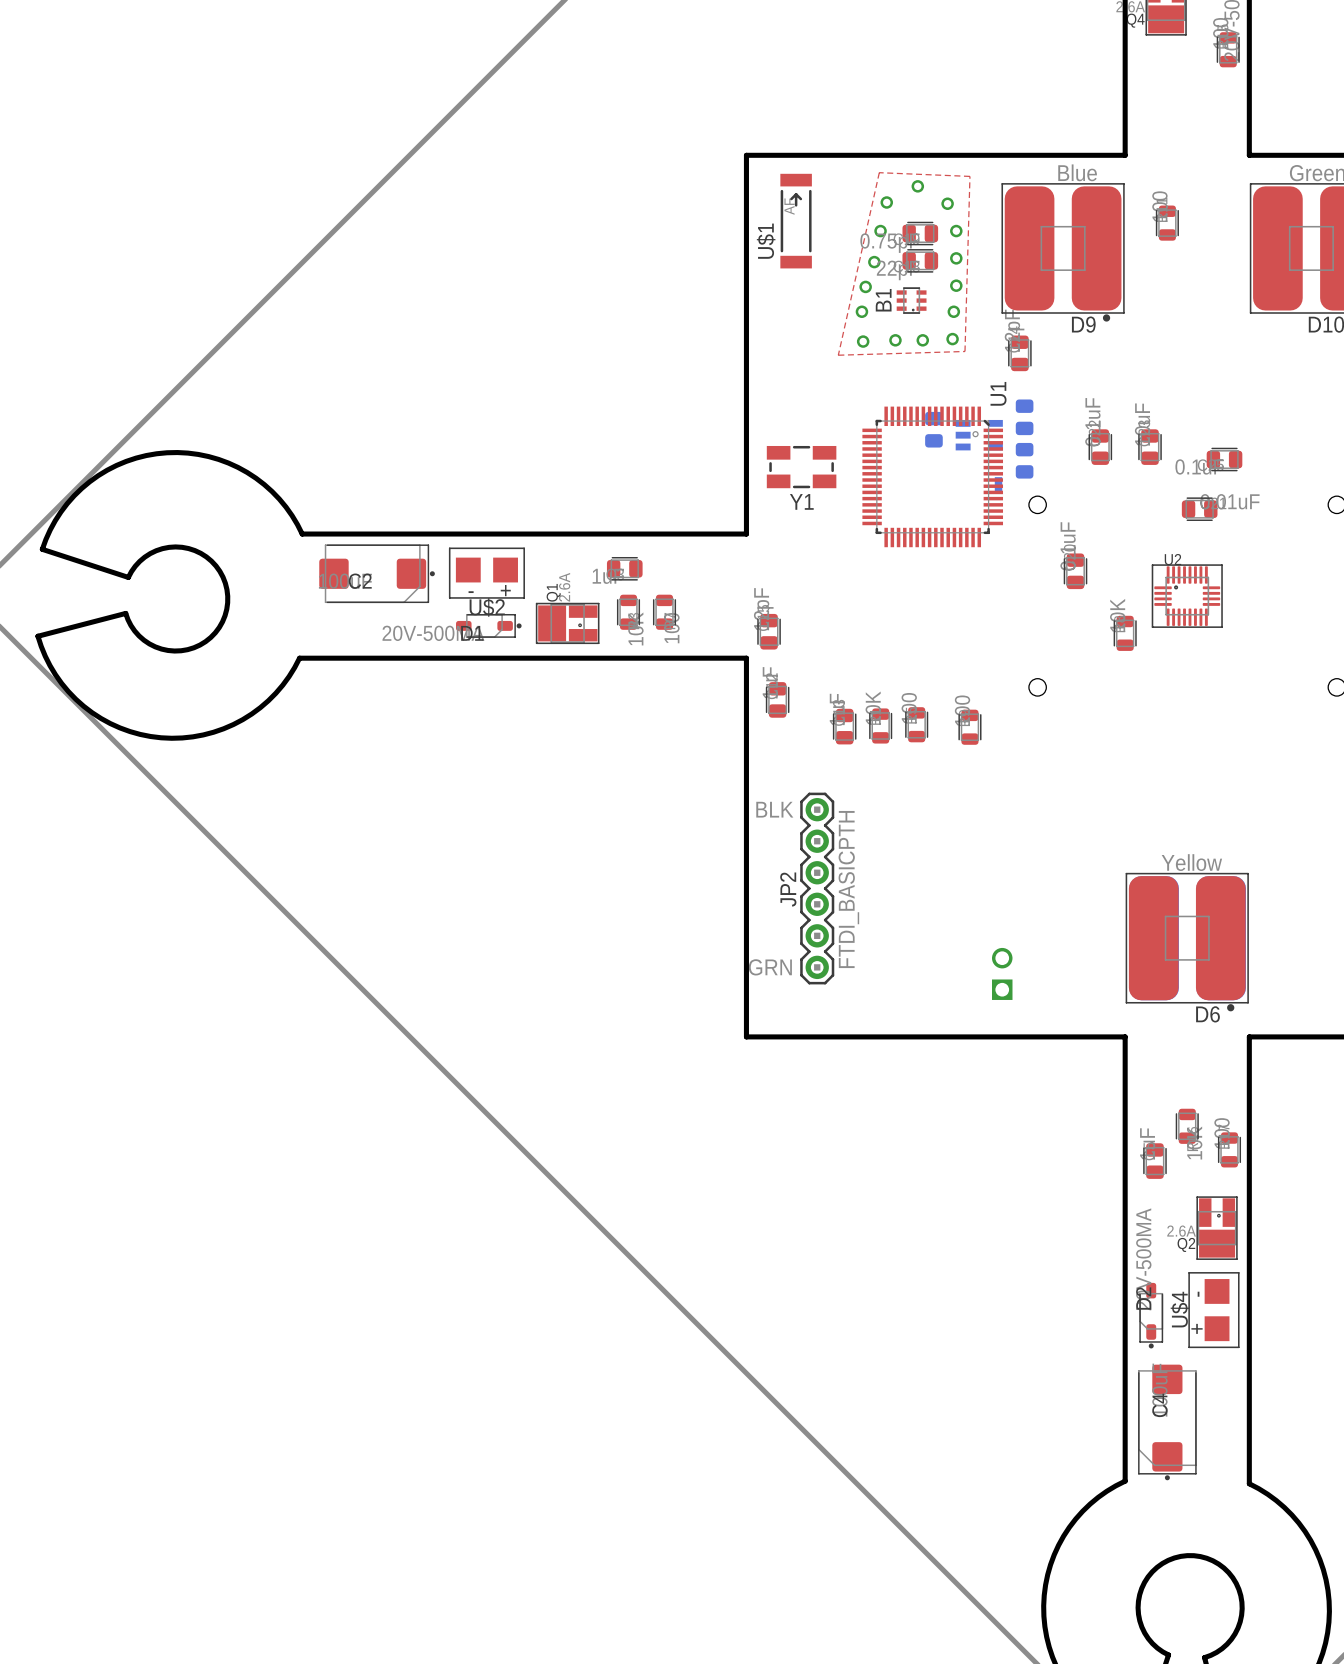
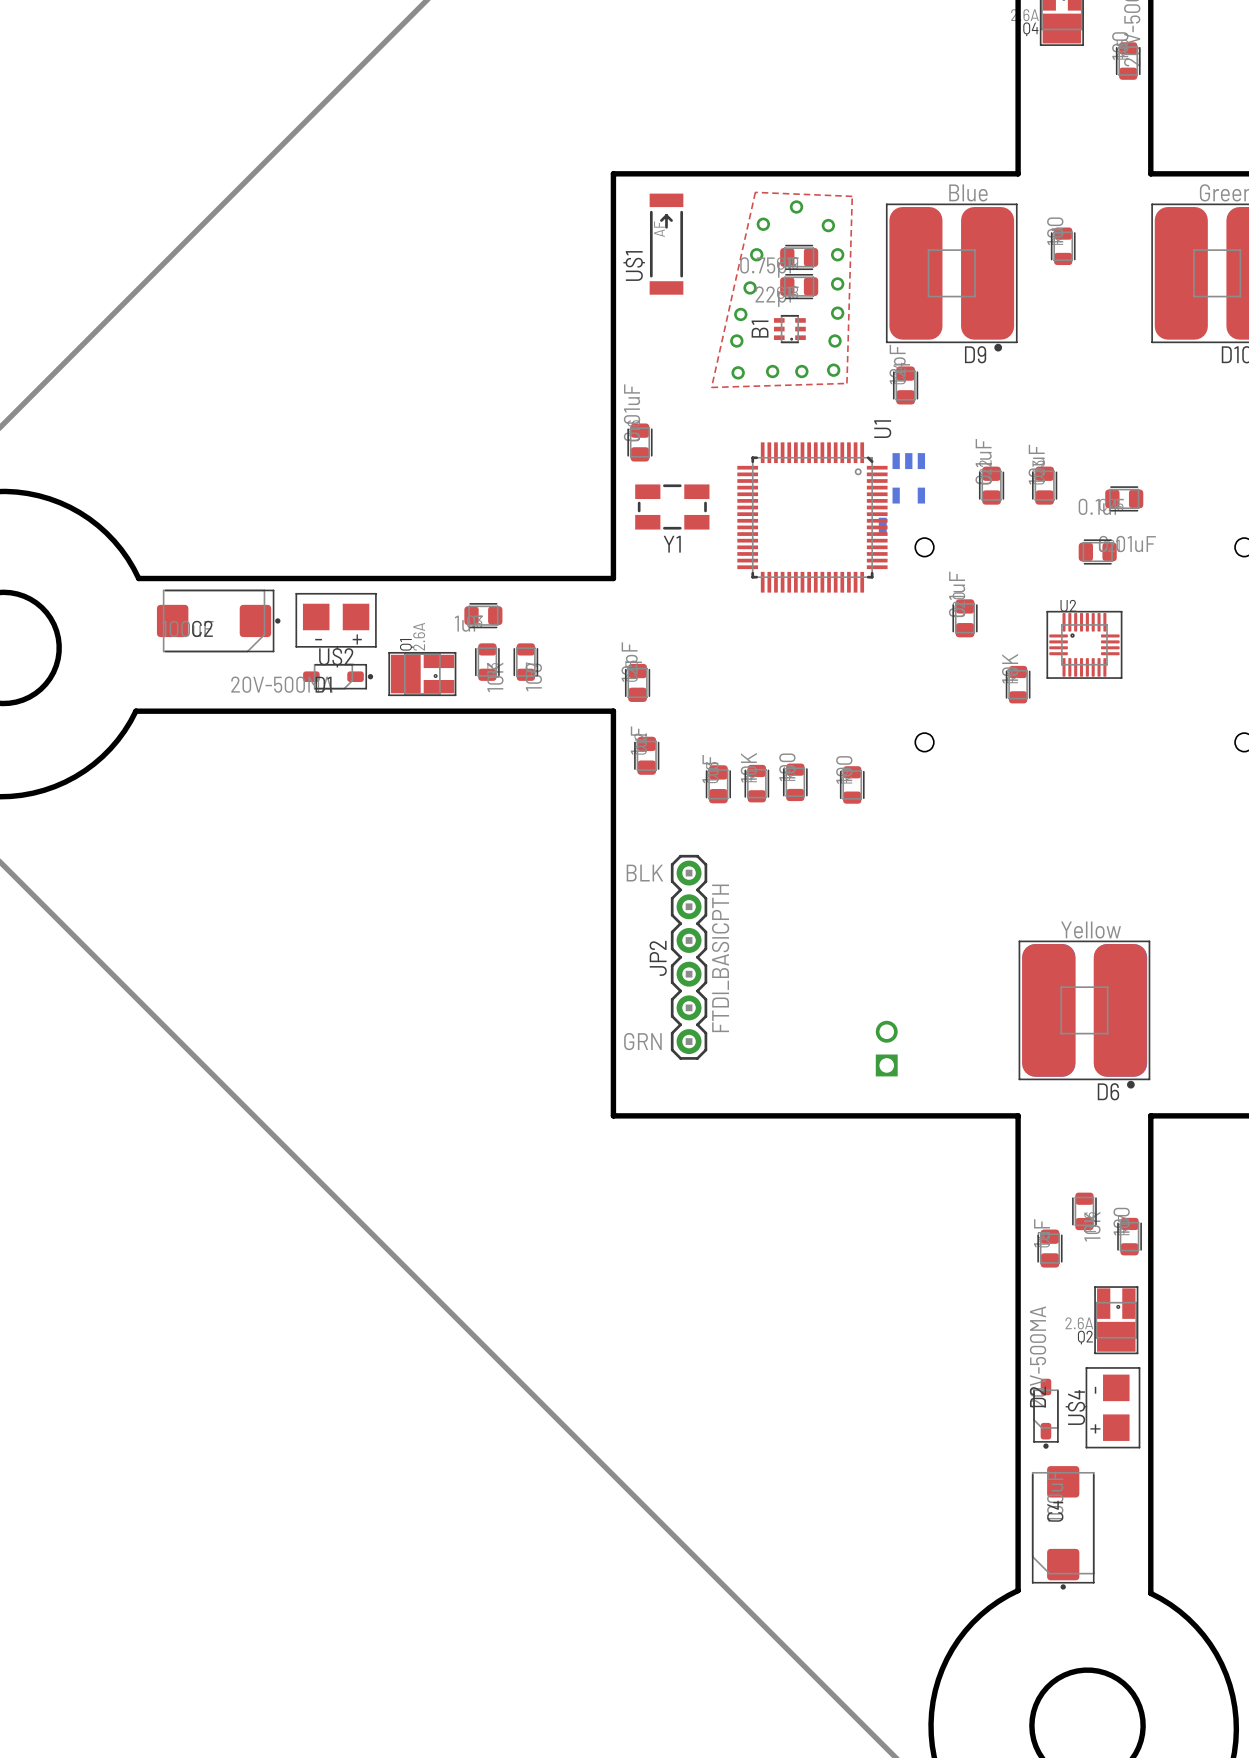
part: (1024, 417) -> none
part: (933, 429) -> none
part rotation: 0° (979, 435) -> 90° clockwise (908, 478)
part position: (979, 435) -> (908, 478)
part side: bottom (1024, 460) -> top (639, 442)

